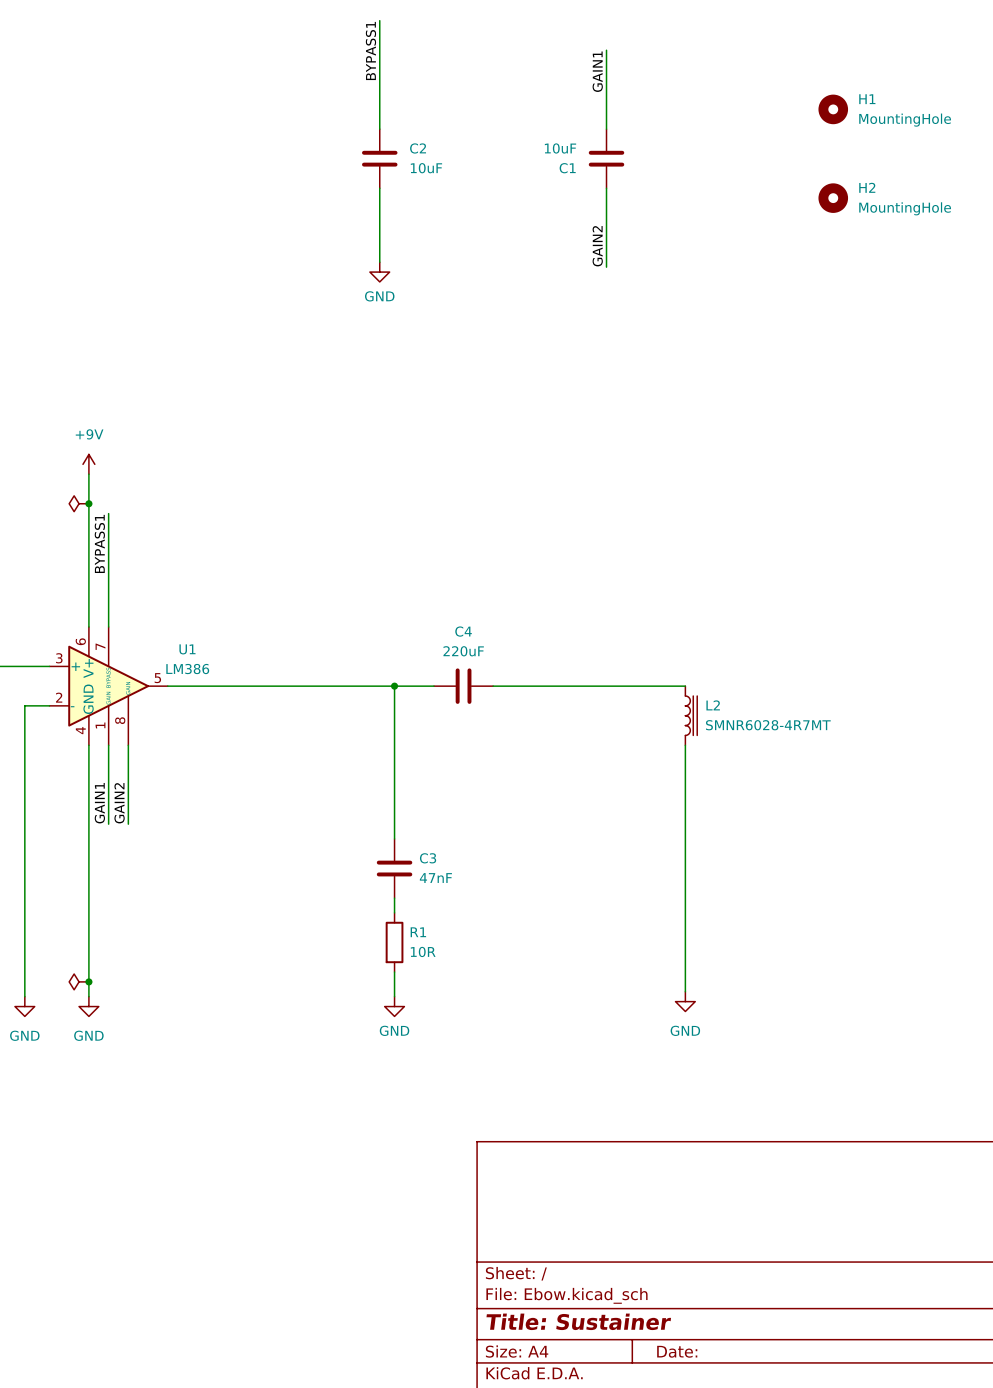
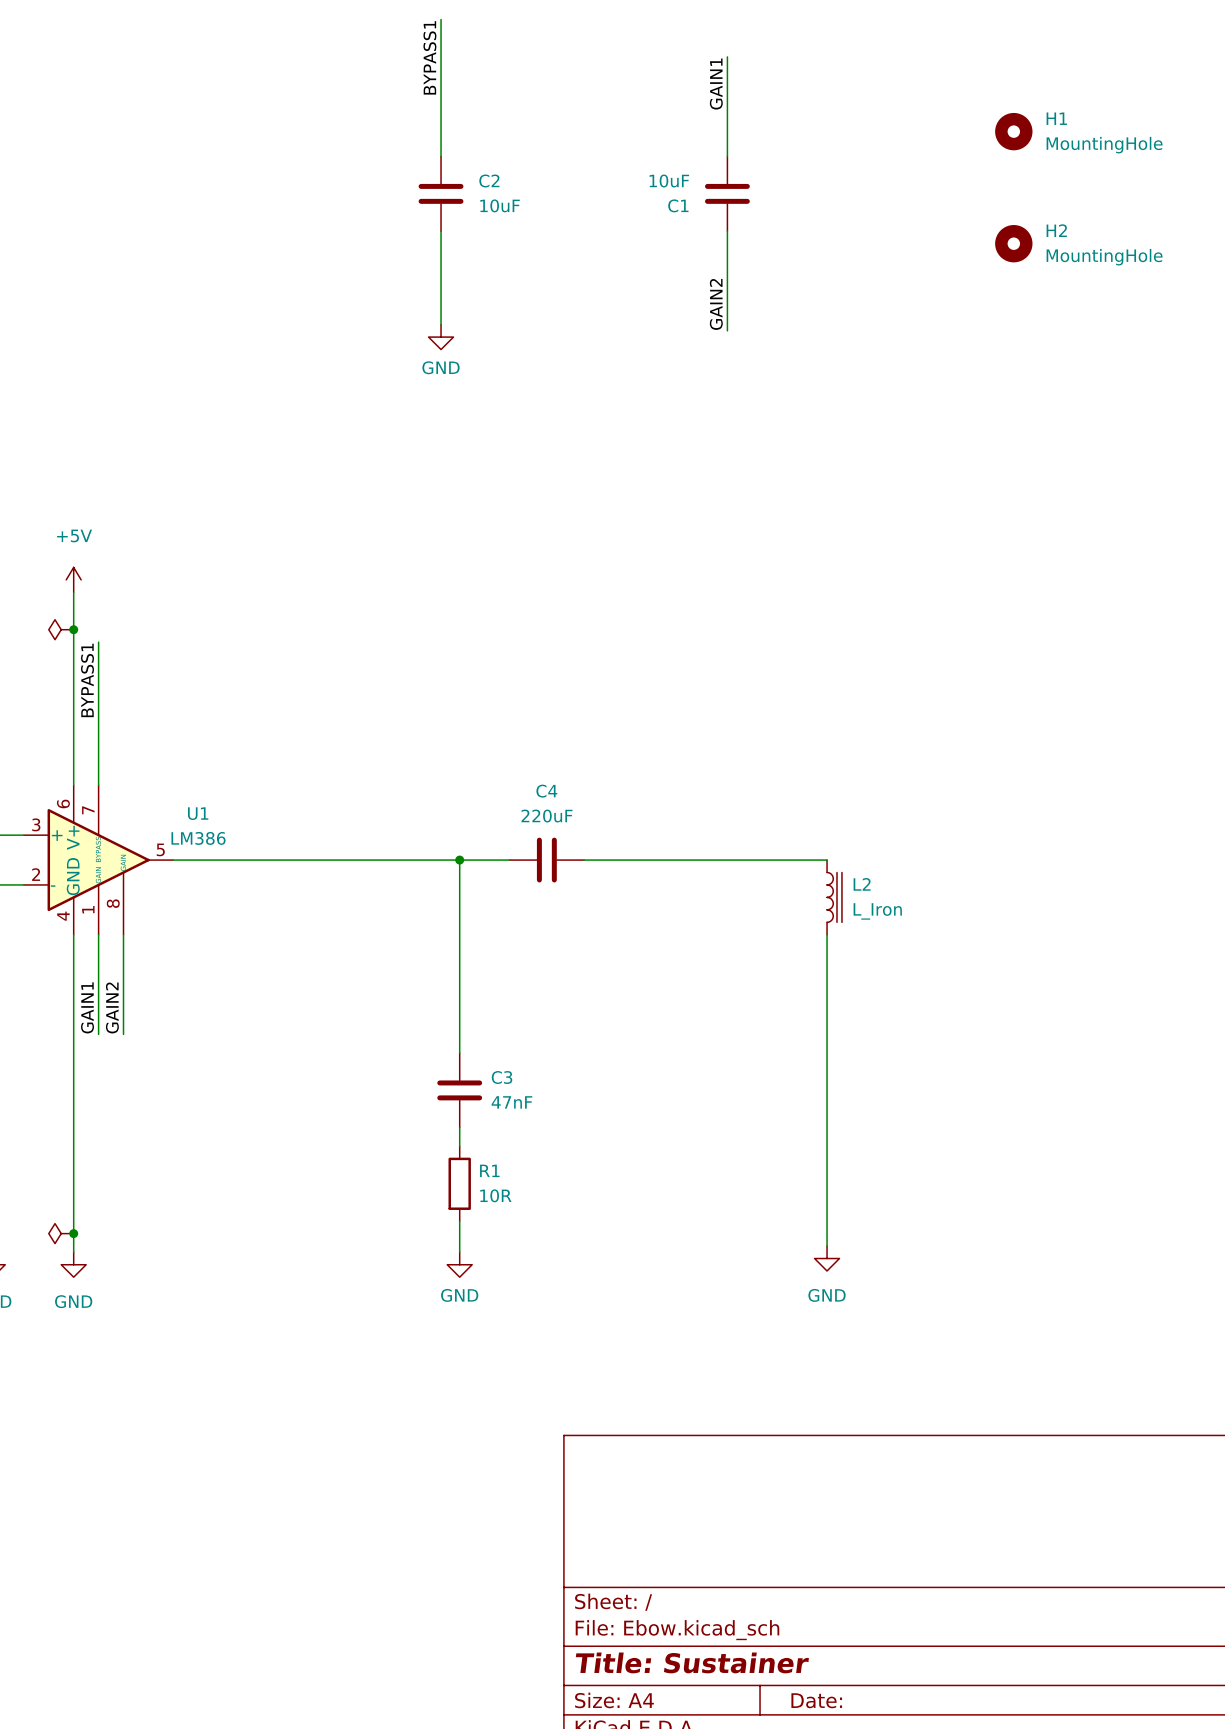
power symbol: +9V (88, 464) -> +5V (73, 579)
L2 value: SMNR6028-4R7MT (768, 725) -> L_Iron (877, 911)

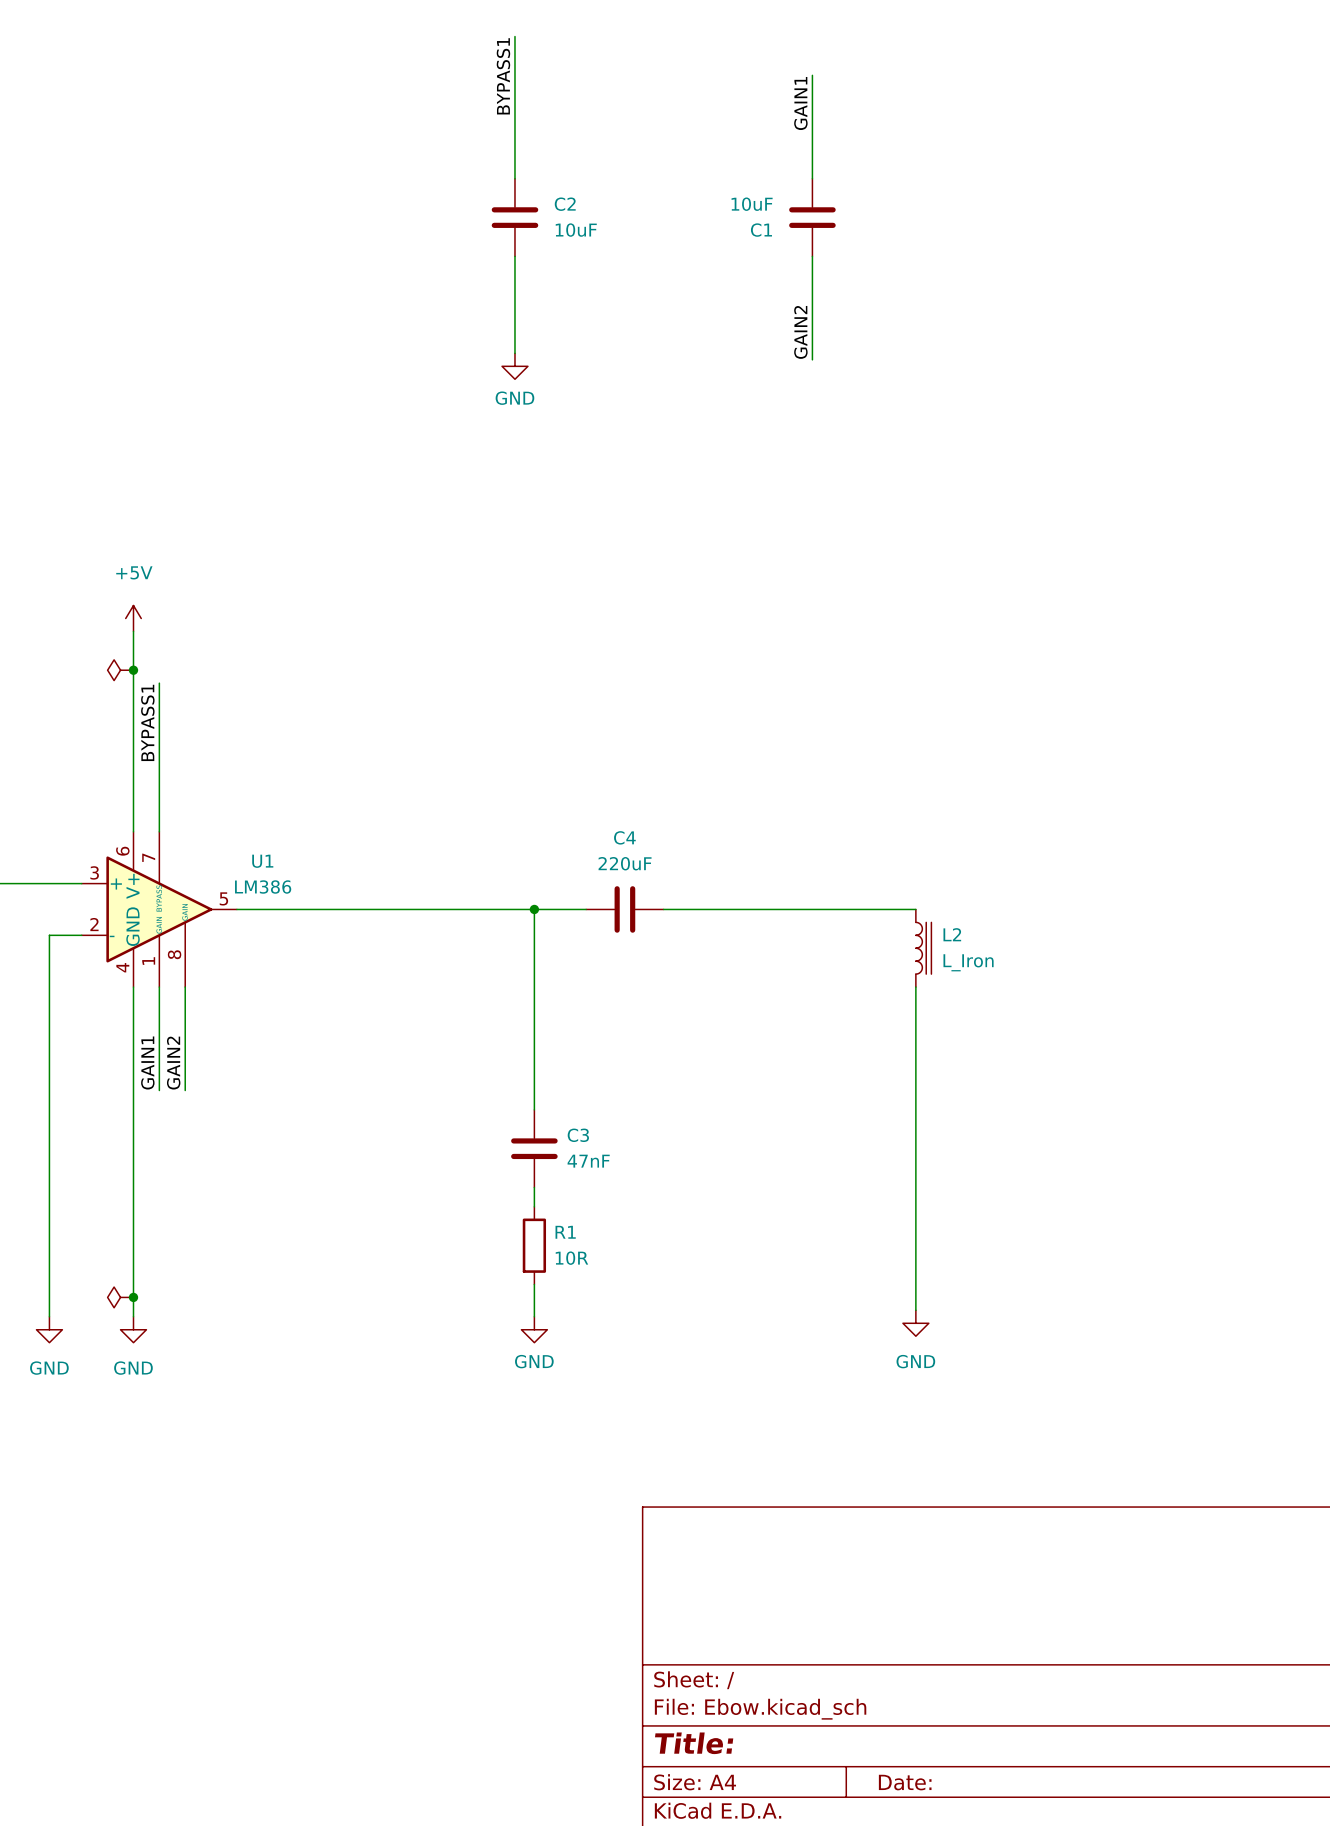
H1: MountingHole (1013, 131) -> none
H2: MountingHole (1013, 243) -> none
title block: Title: Sustainer (692, 1662) -> Title: (694, 1743)

